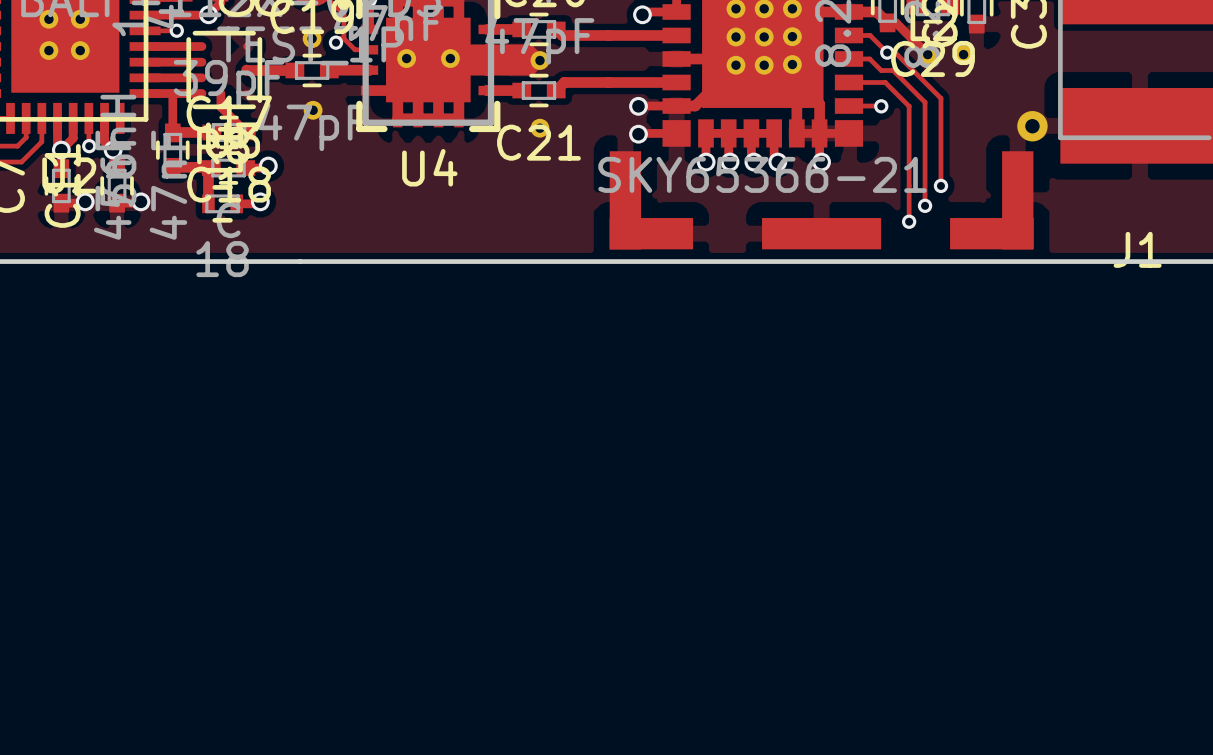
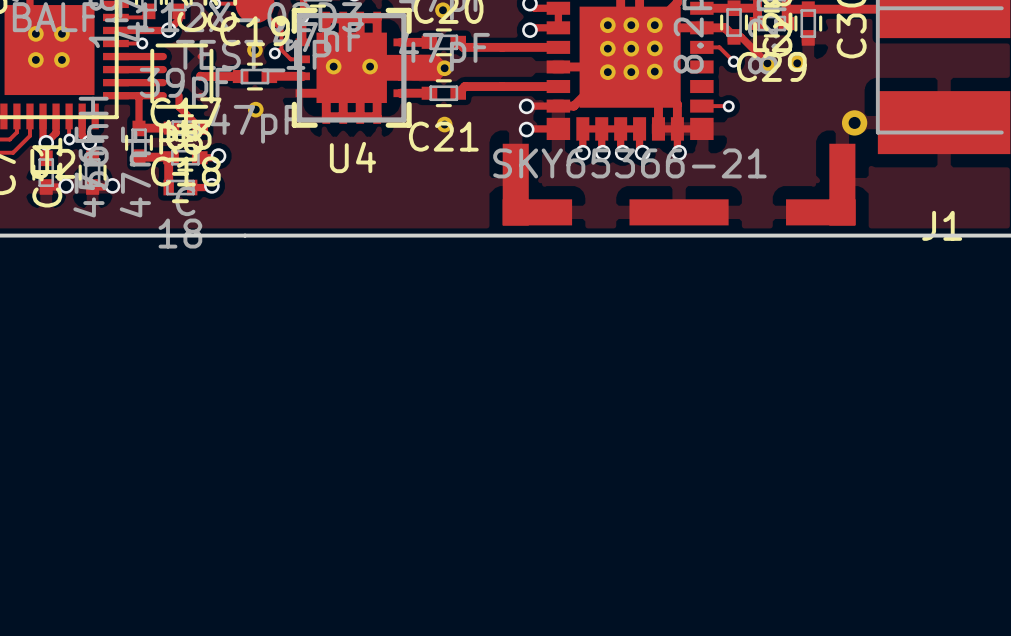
track: (887, 52) (895, 52) (940, 98) (940, 185) -> none
track: (848, 58) (869, 58) (881, 70) (893, 70) (925, 102) (925, 205) -> none
track: (848, 82) (885, 82) (909, 106) (909, 221) -> none
via: (940, 185) -> none
via: (925, 205) -> none
via: (909, 221) -> none

